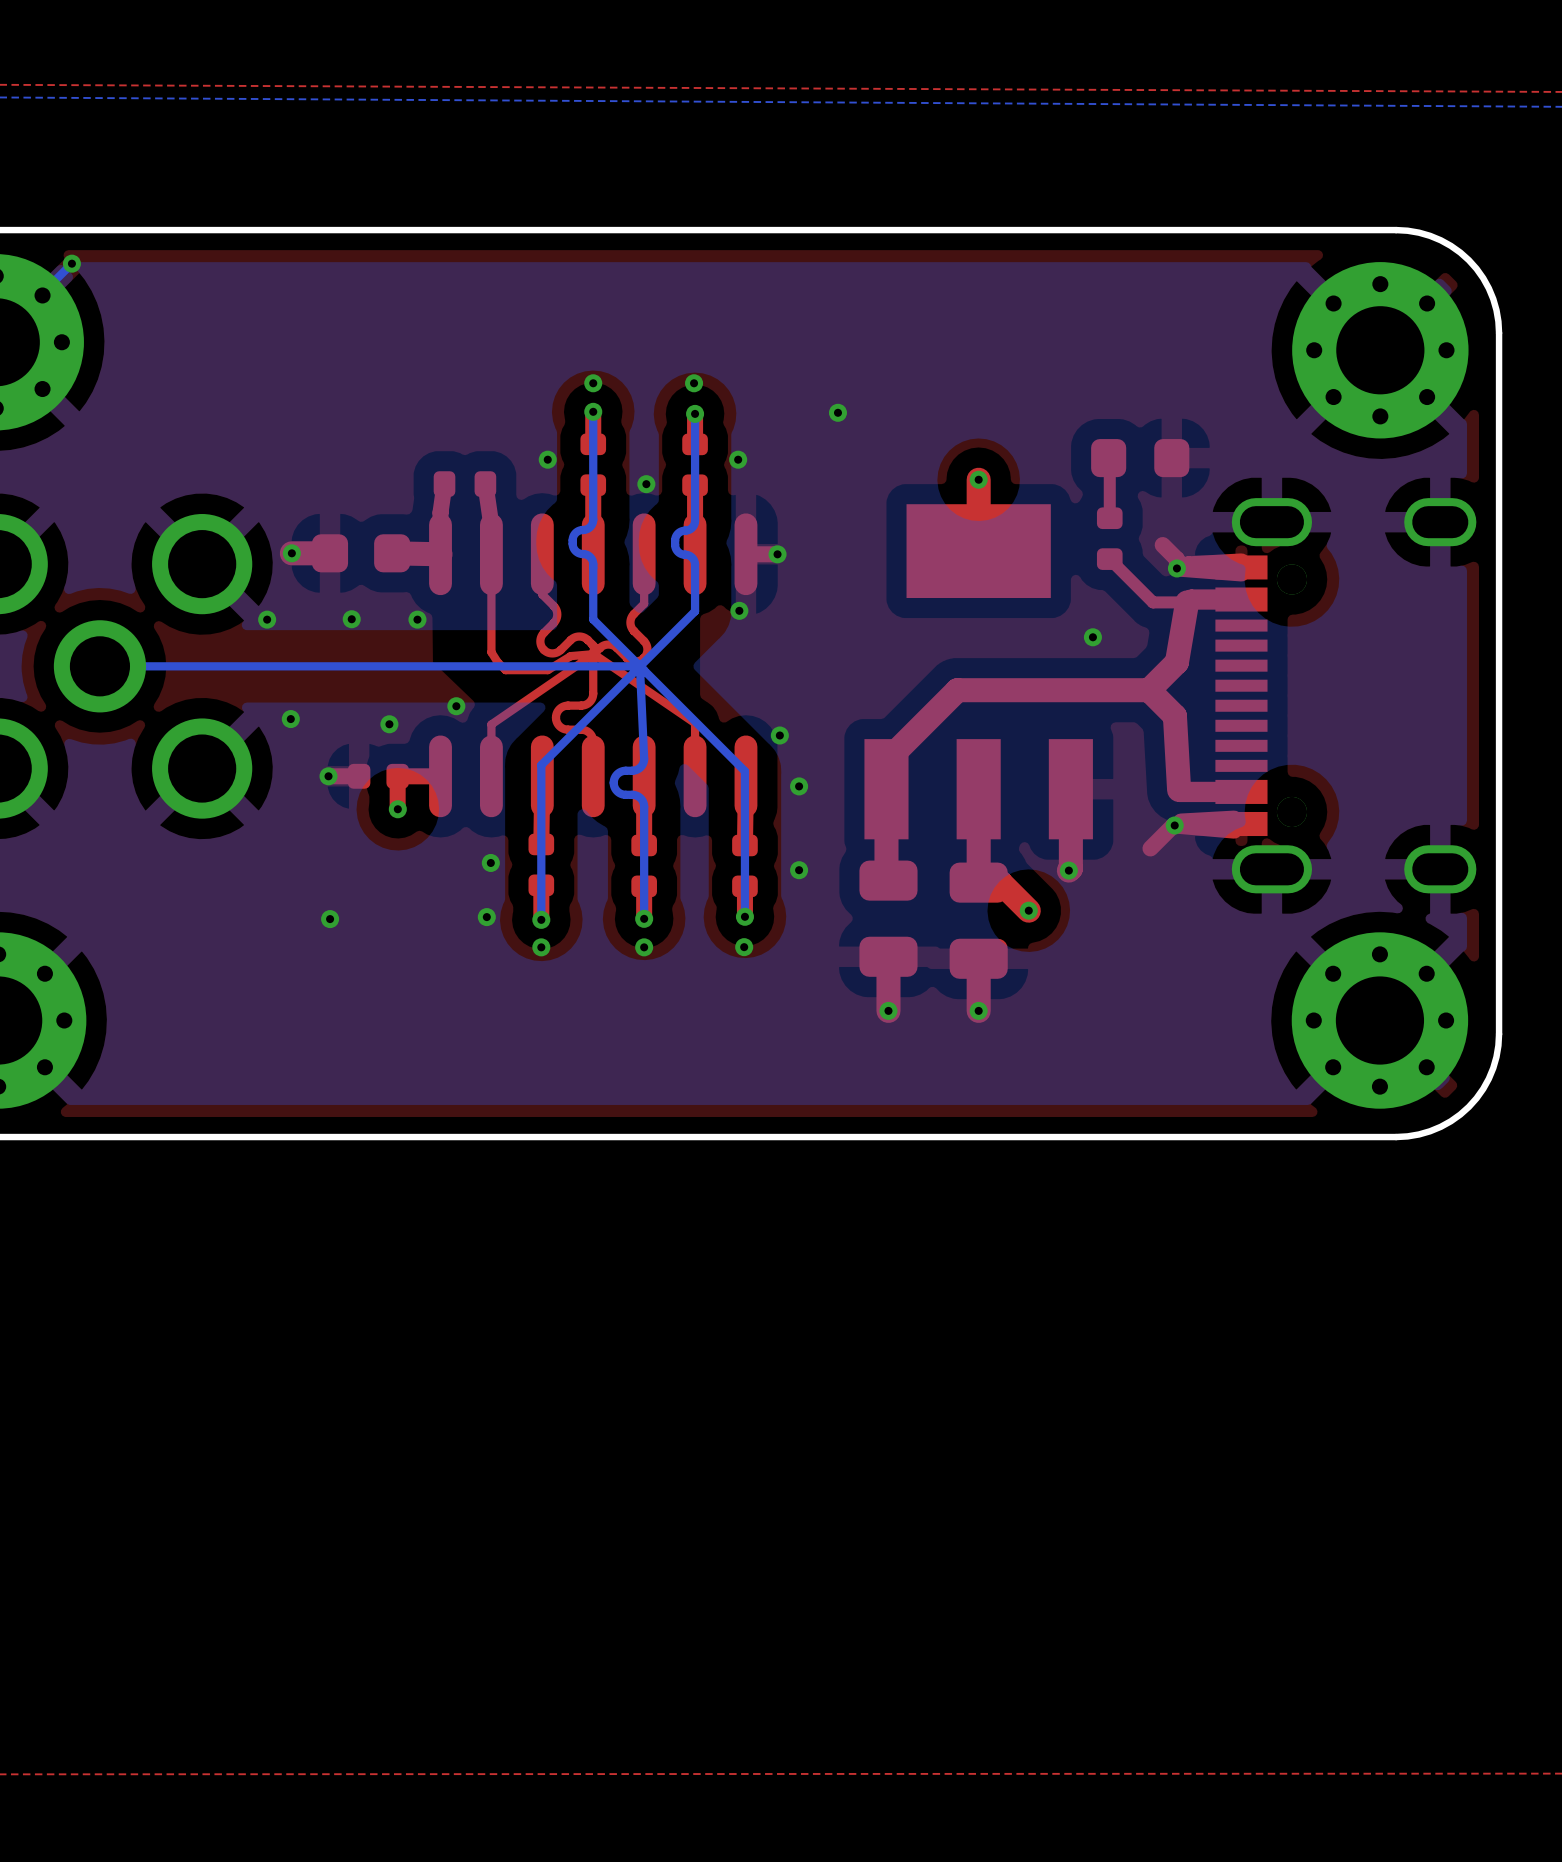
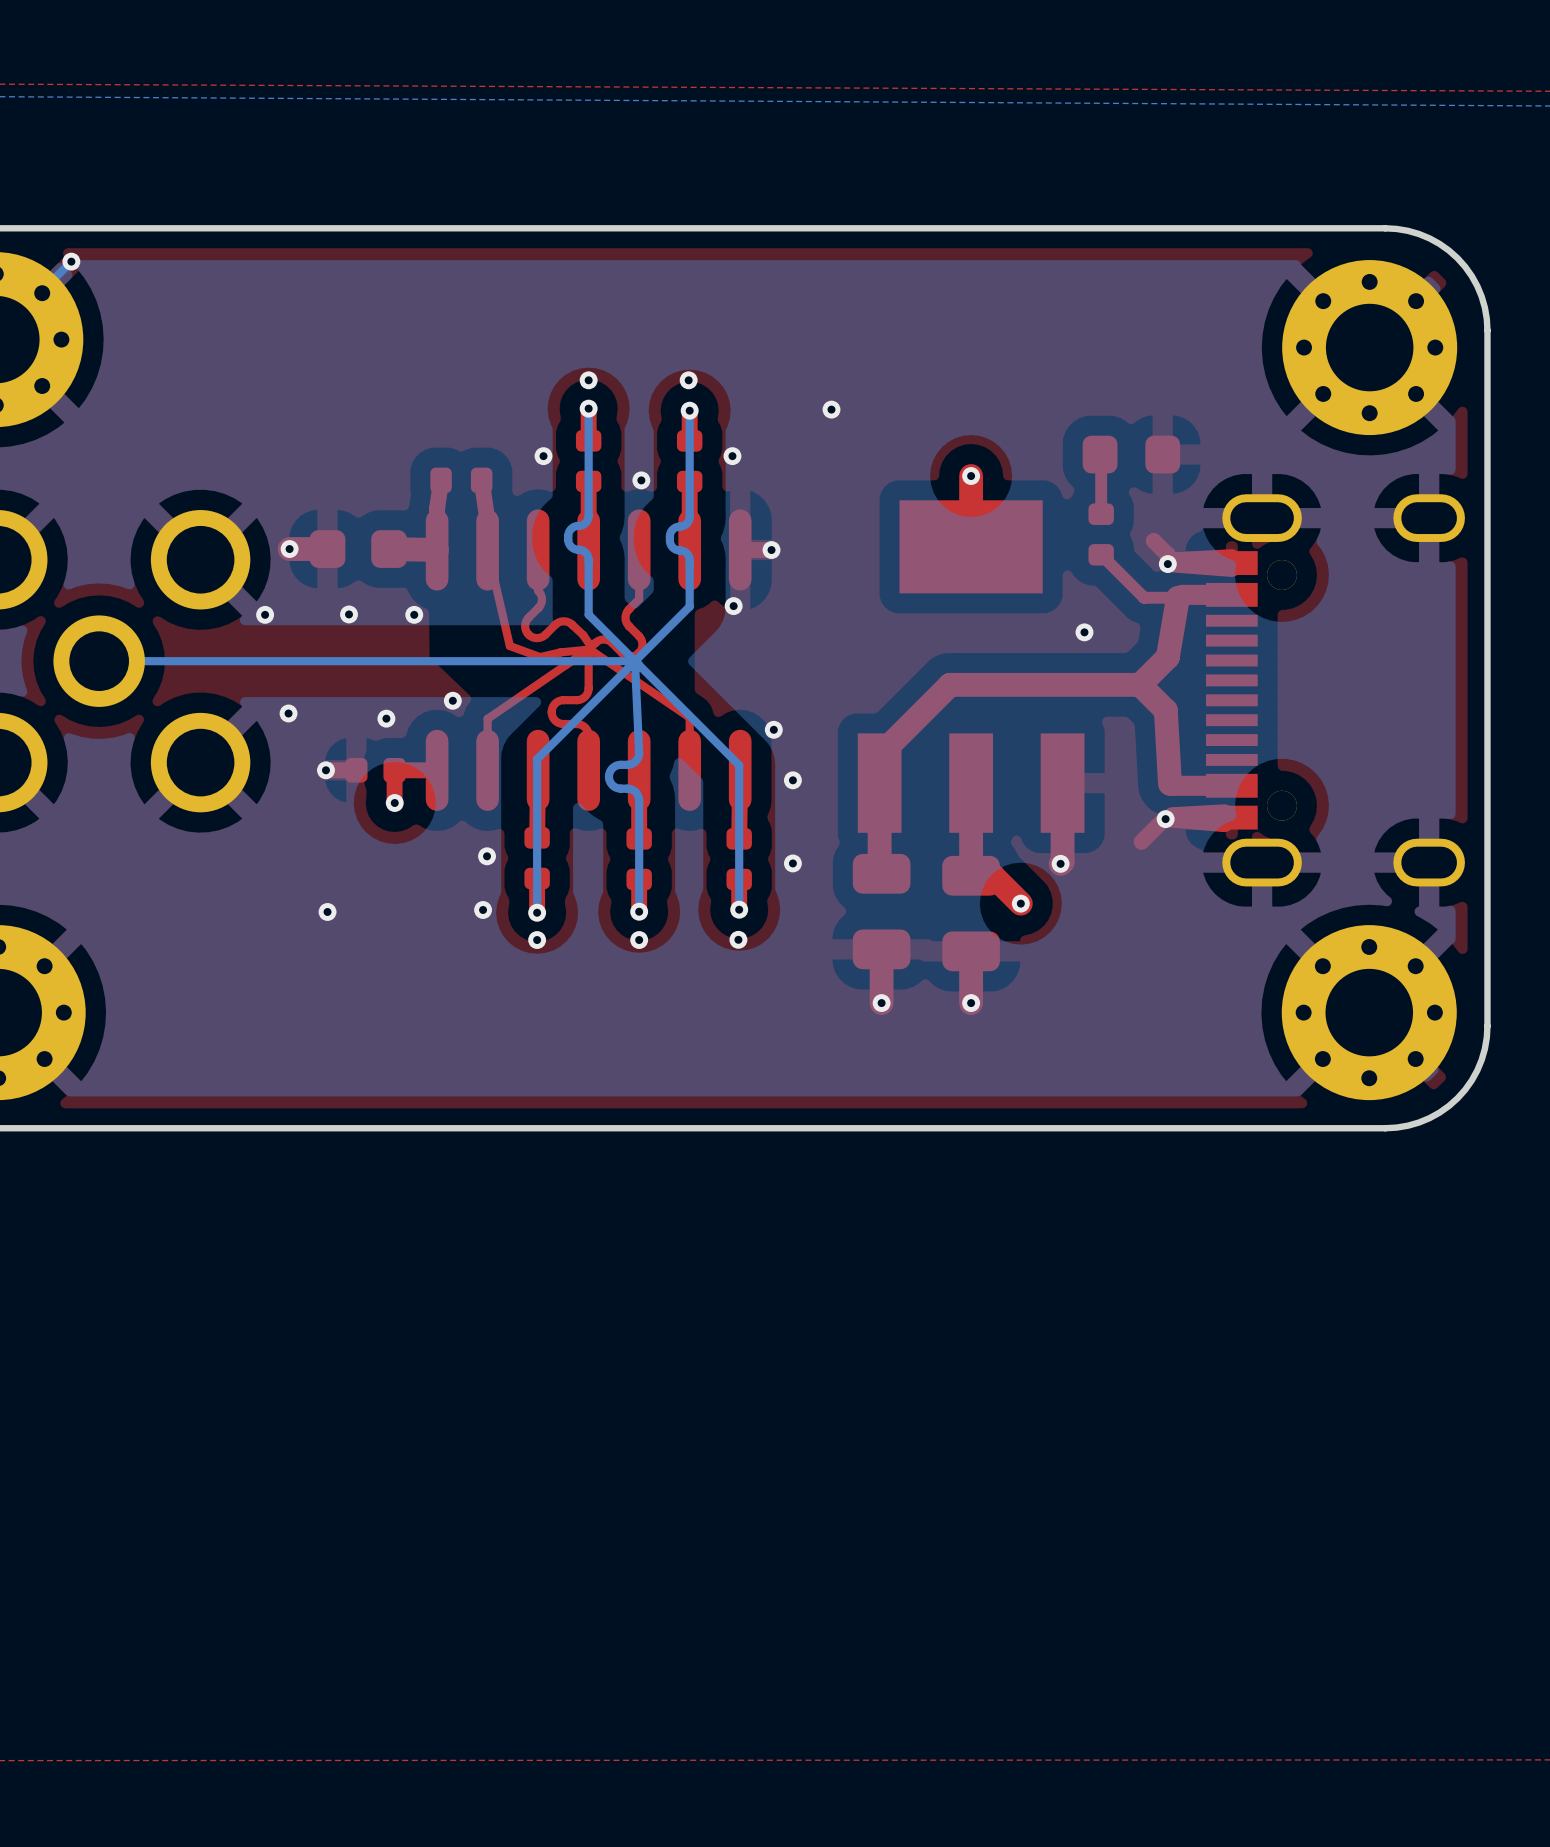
top track: (491, 554) (491, 652) (505, 670) (547, 670) (570, 656) (593, 654) (593, 646) (586, 639) (580, 636) (572, 638) (556, 652) (549, 653) (542, 648) (540, 642) (541, 636) (554, 622) (557, 614) (554, 607) (542, 594) -> (487, 549) (509, 646) (540, 657) (560, 652) (588, 649)
top track: none -> (538, 549) (538, 591) (541, 600) (539, 606) (526, 620) (526, 631) (531, 636) (539, 637) (557, 623) (566, 621) (583, 635) (590, 646)

